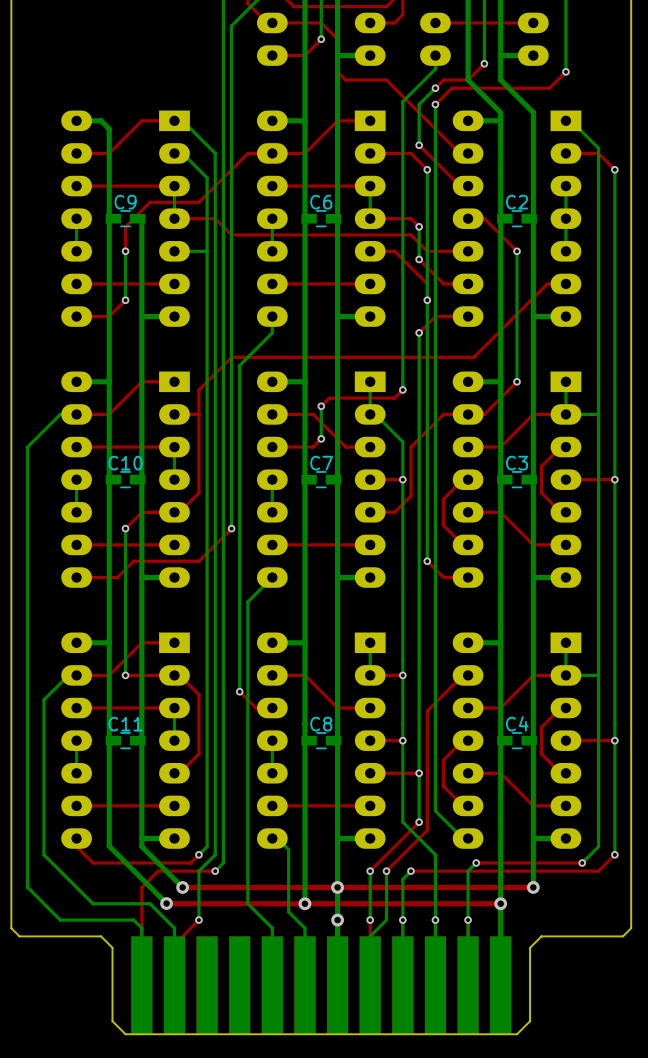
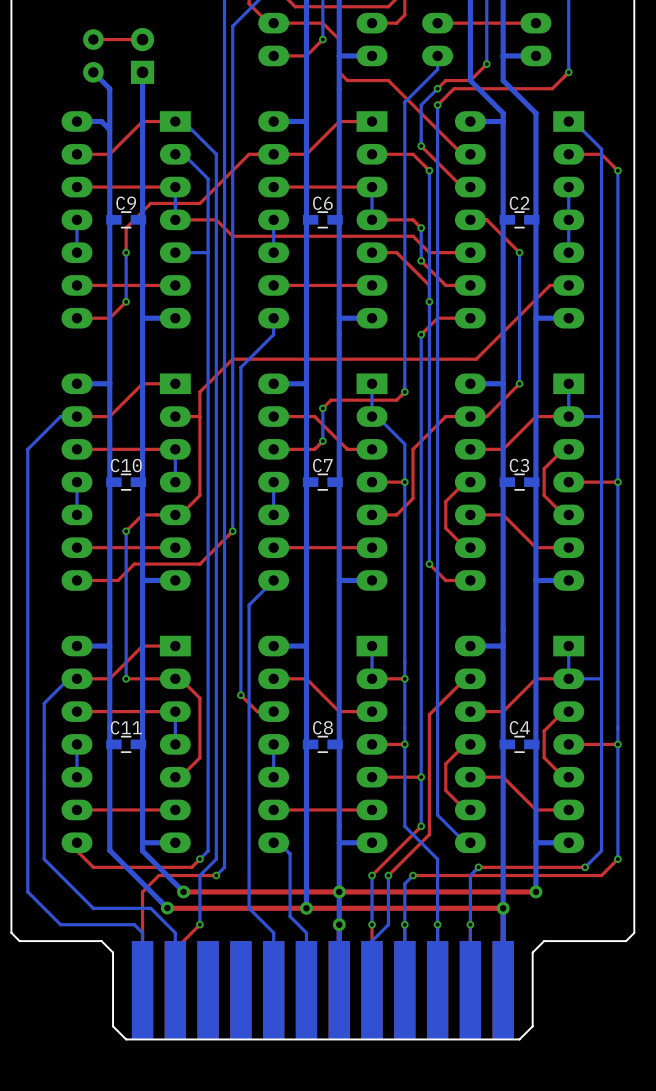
top track: none -> (142, 39) (93, 39)
part: none -> (93, 55)
part: none -> (142, 55)
bottom track: none -> (93, 72) (109, 88) (109, 129)
bottom track: none -> (142, 72) (142, 219)

